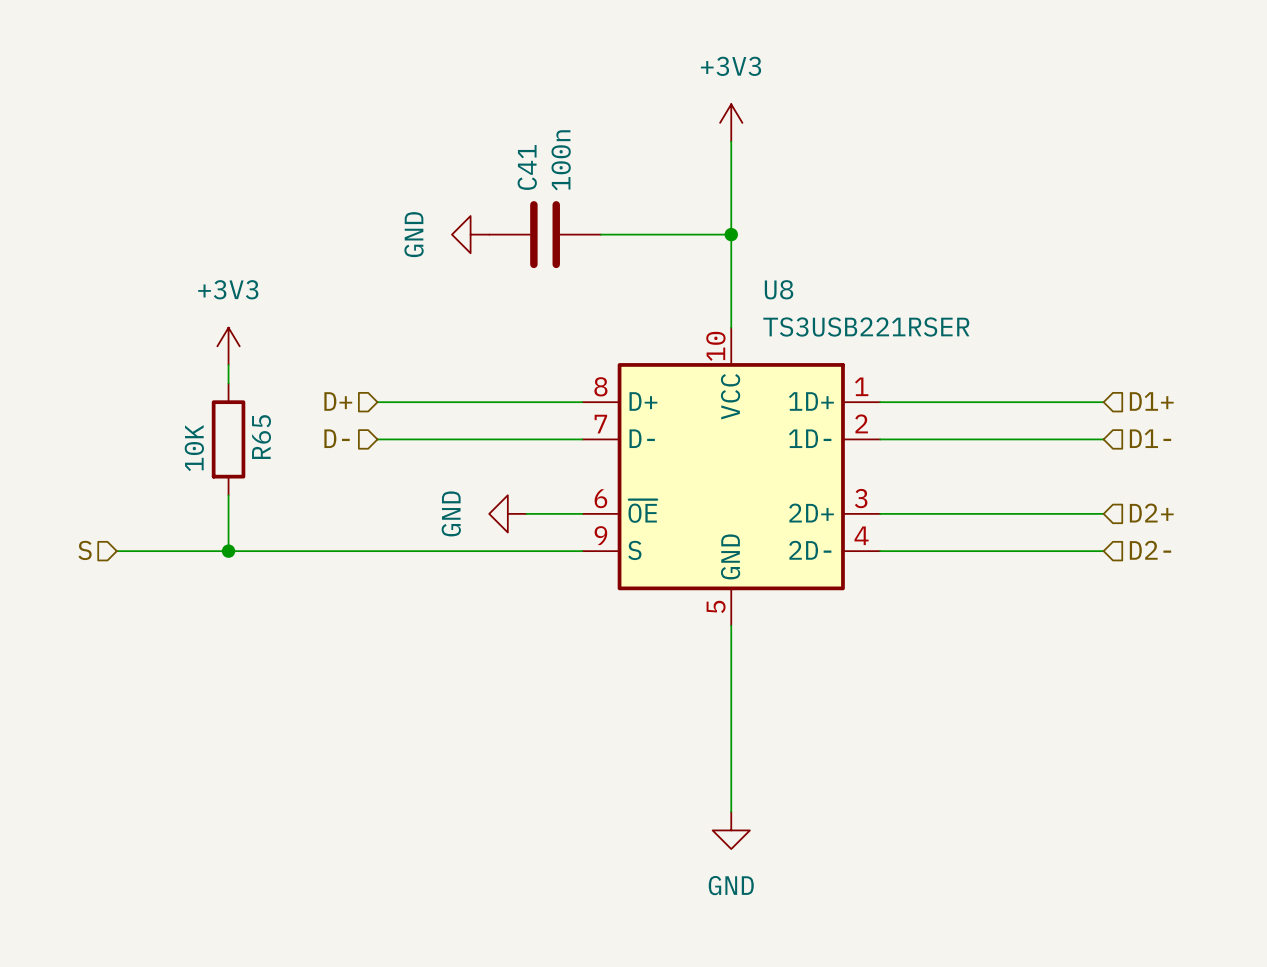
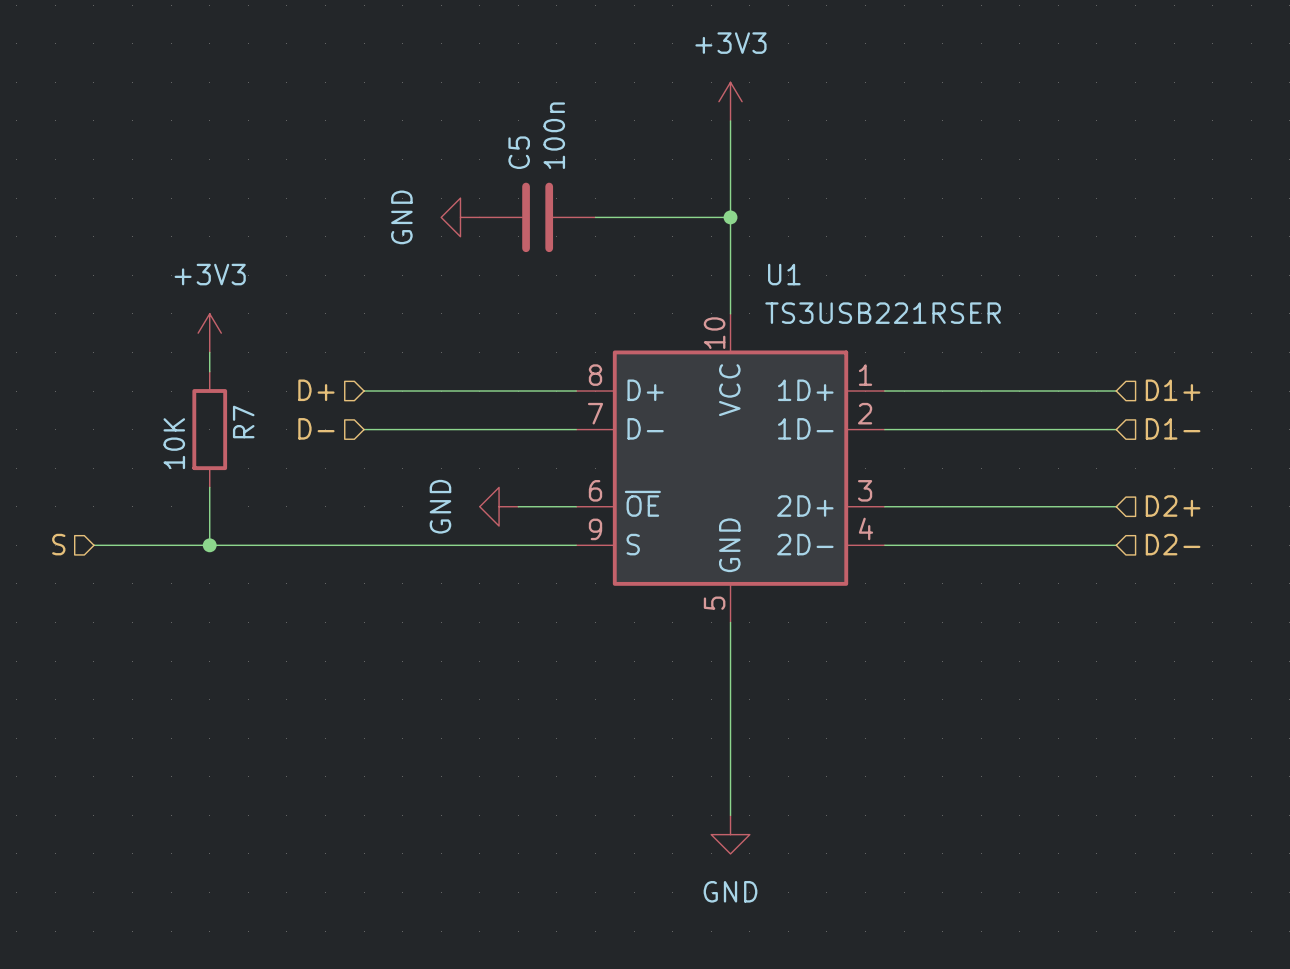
C41 name: C41 (527, 167) -> C5 (519, 152)
U8 name: U8 (779, 289) -> U1 (784, 274)
R65 name: R65 (261, 437) -> R7 (243, 422)

